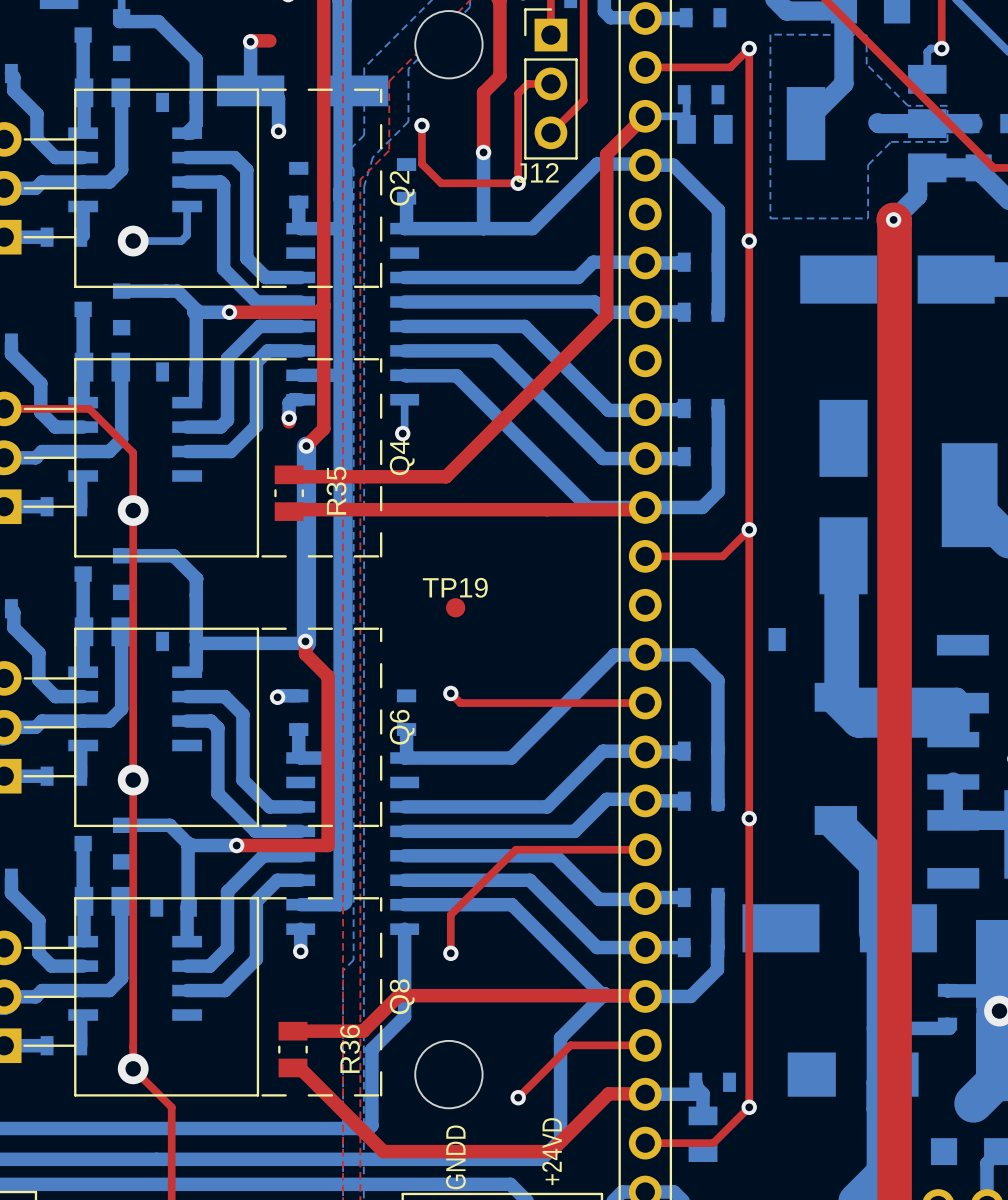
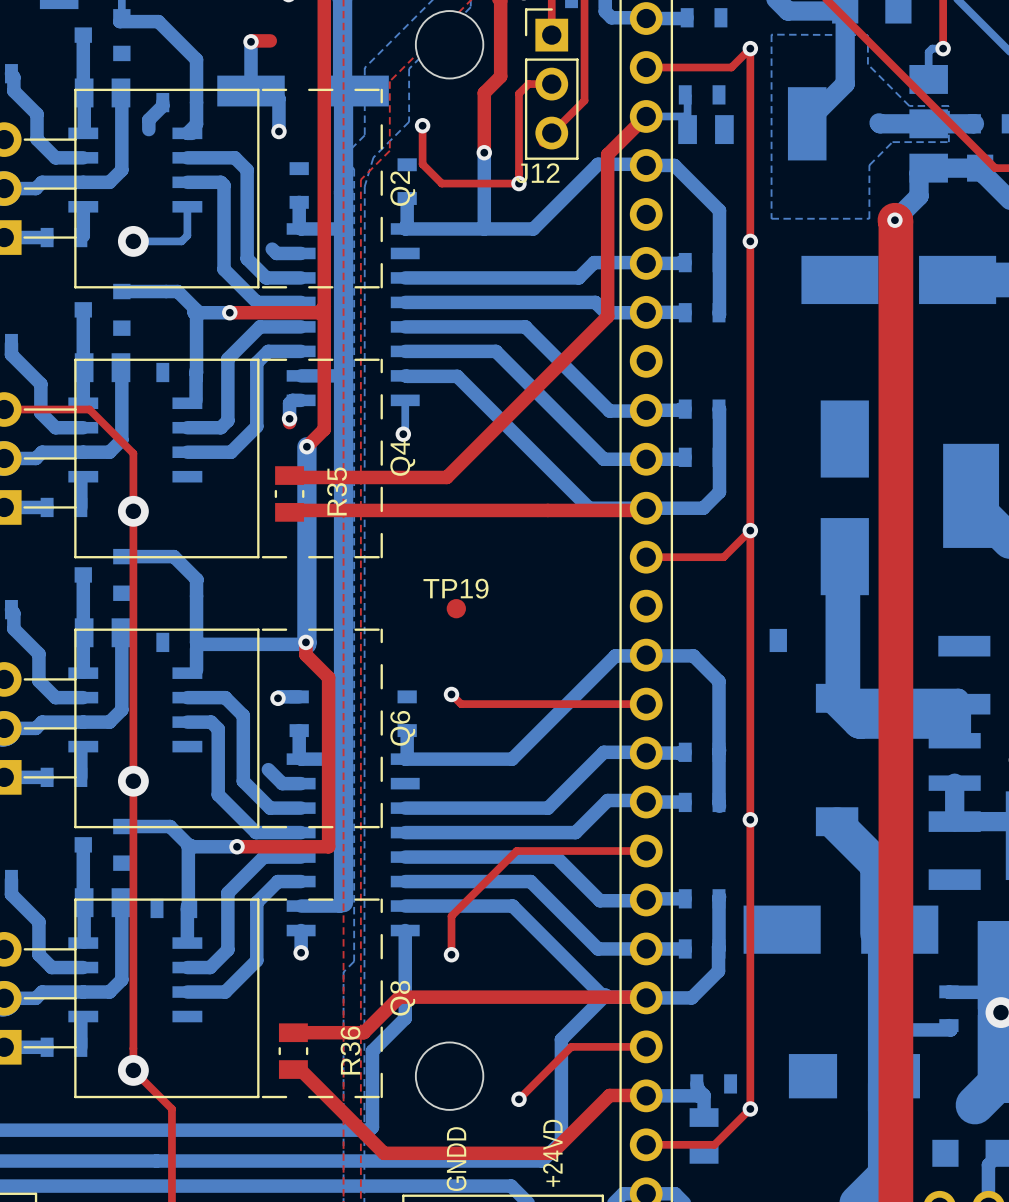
bottom track: none -> (162, 102) (162, 105) (148, 119) (148, 129)
bottom track: none -> (272, 249) (276, 253) (301, 253)
bottom track: none -> (268, 769) (282, 783) (301, 783)

